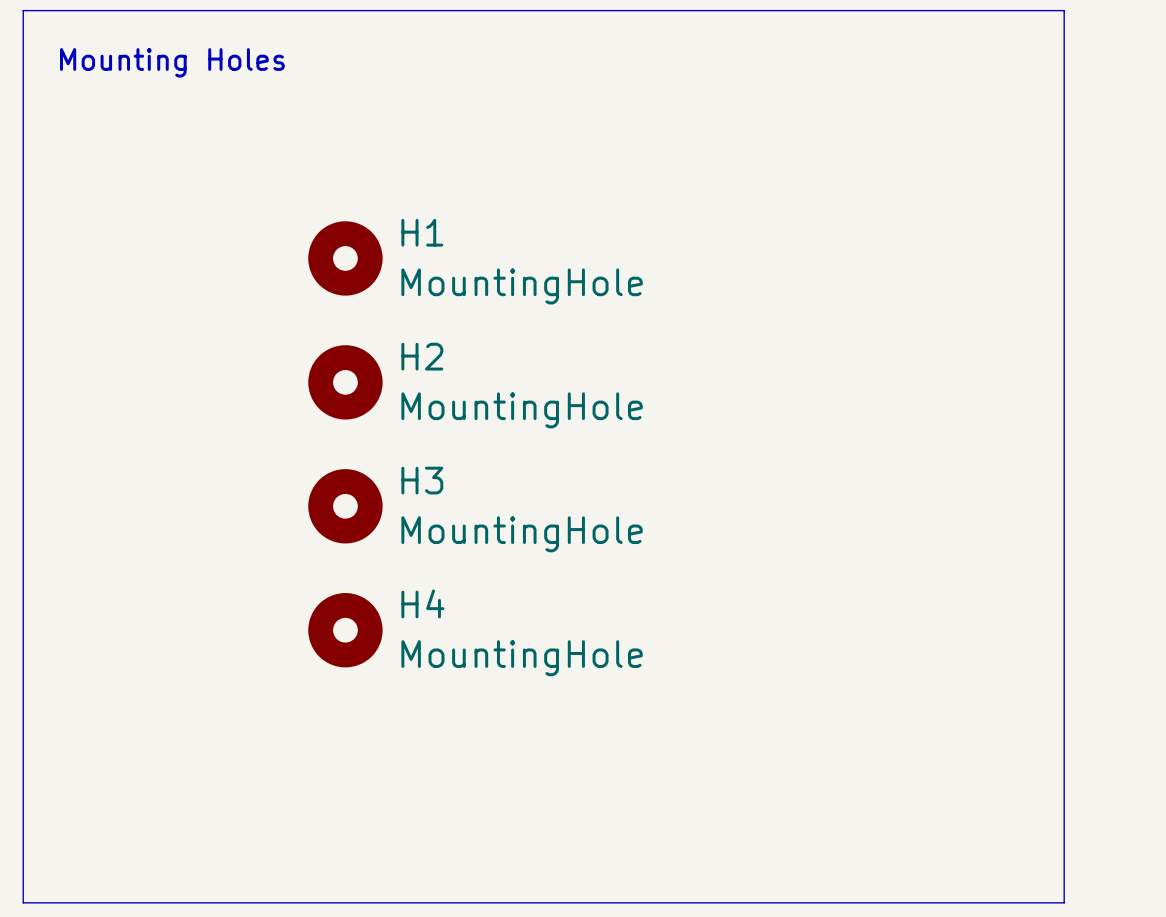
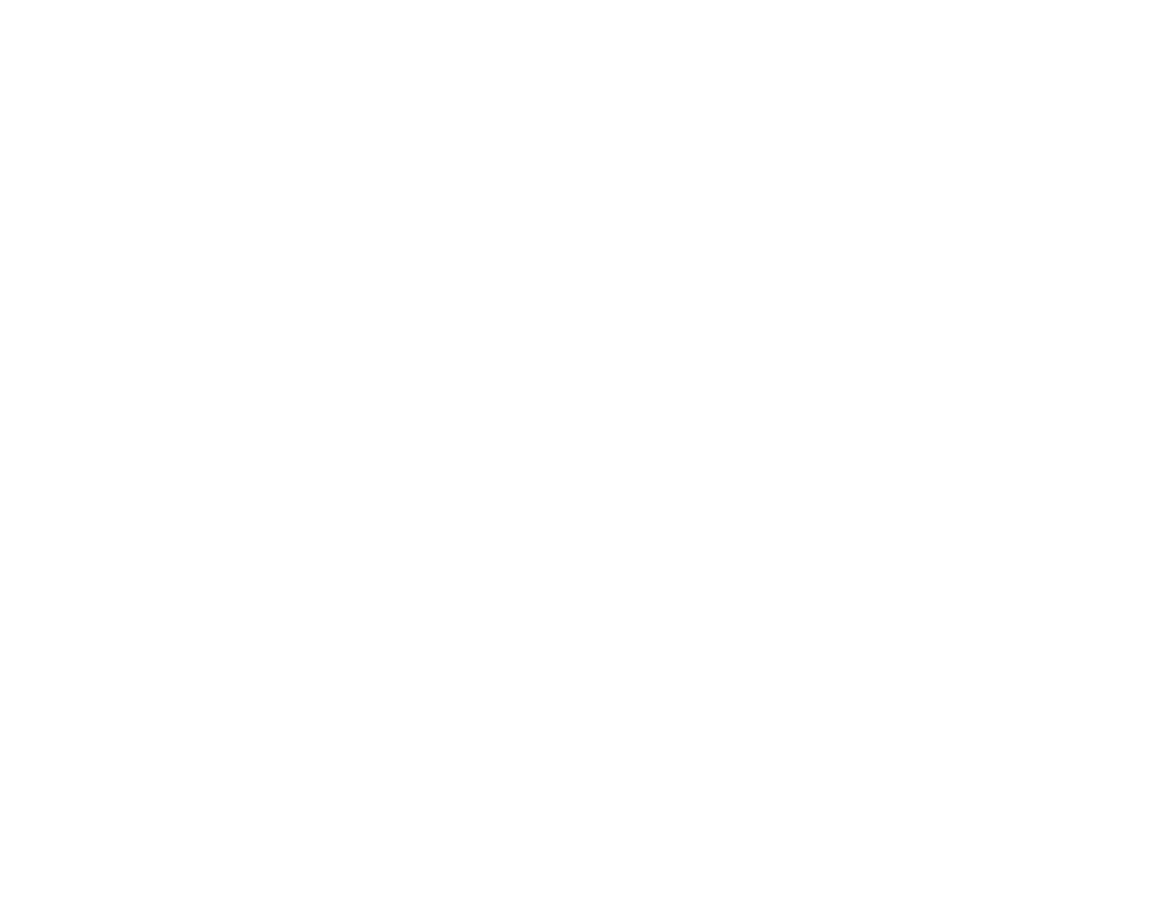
line: (23, 10) (1064, 10) (1064, 902) (23, 902) (23, 10) -> none
text: Mounting Holes (172, 62) -> none
H1: MountingHole (345, 258) -> none
H2: MountingHole (345, 382) -> none
H3: MountingHole (345, 506) -> none
H4: MountingHole (345, 630) -> none

